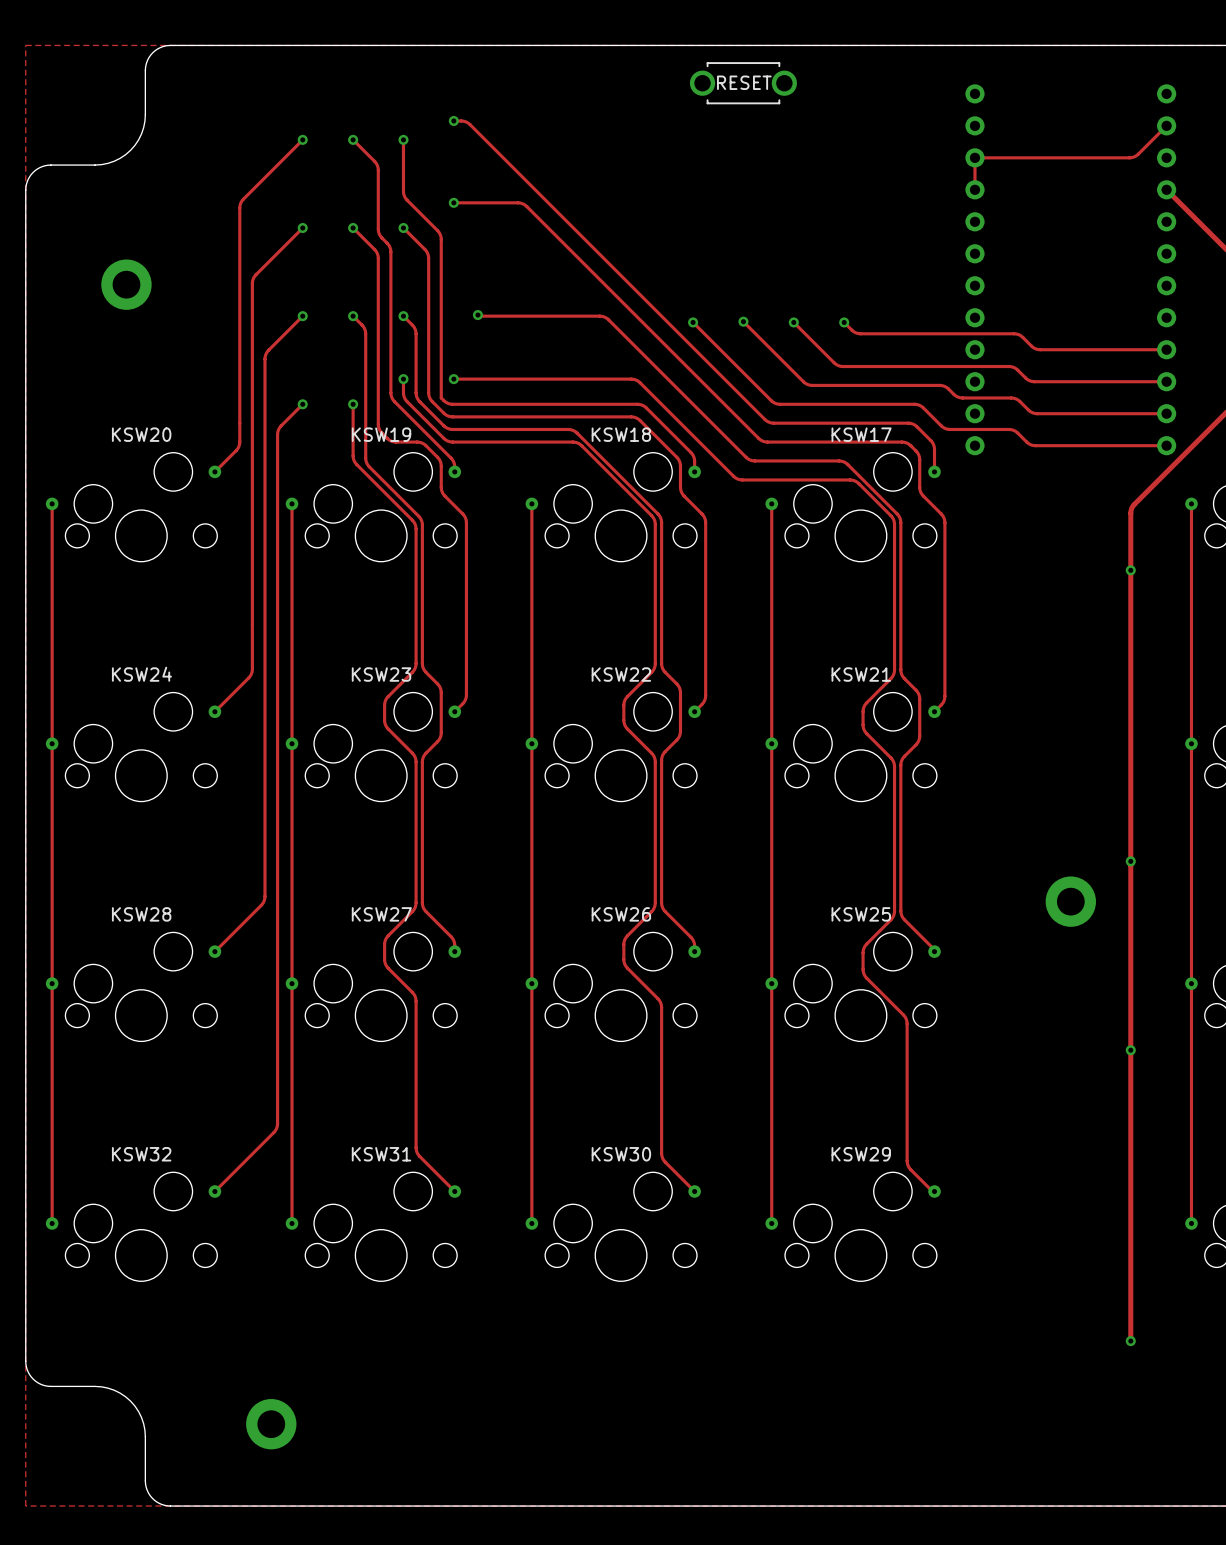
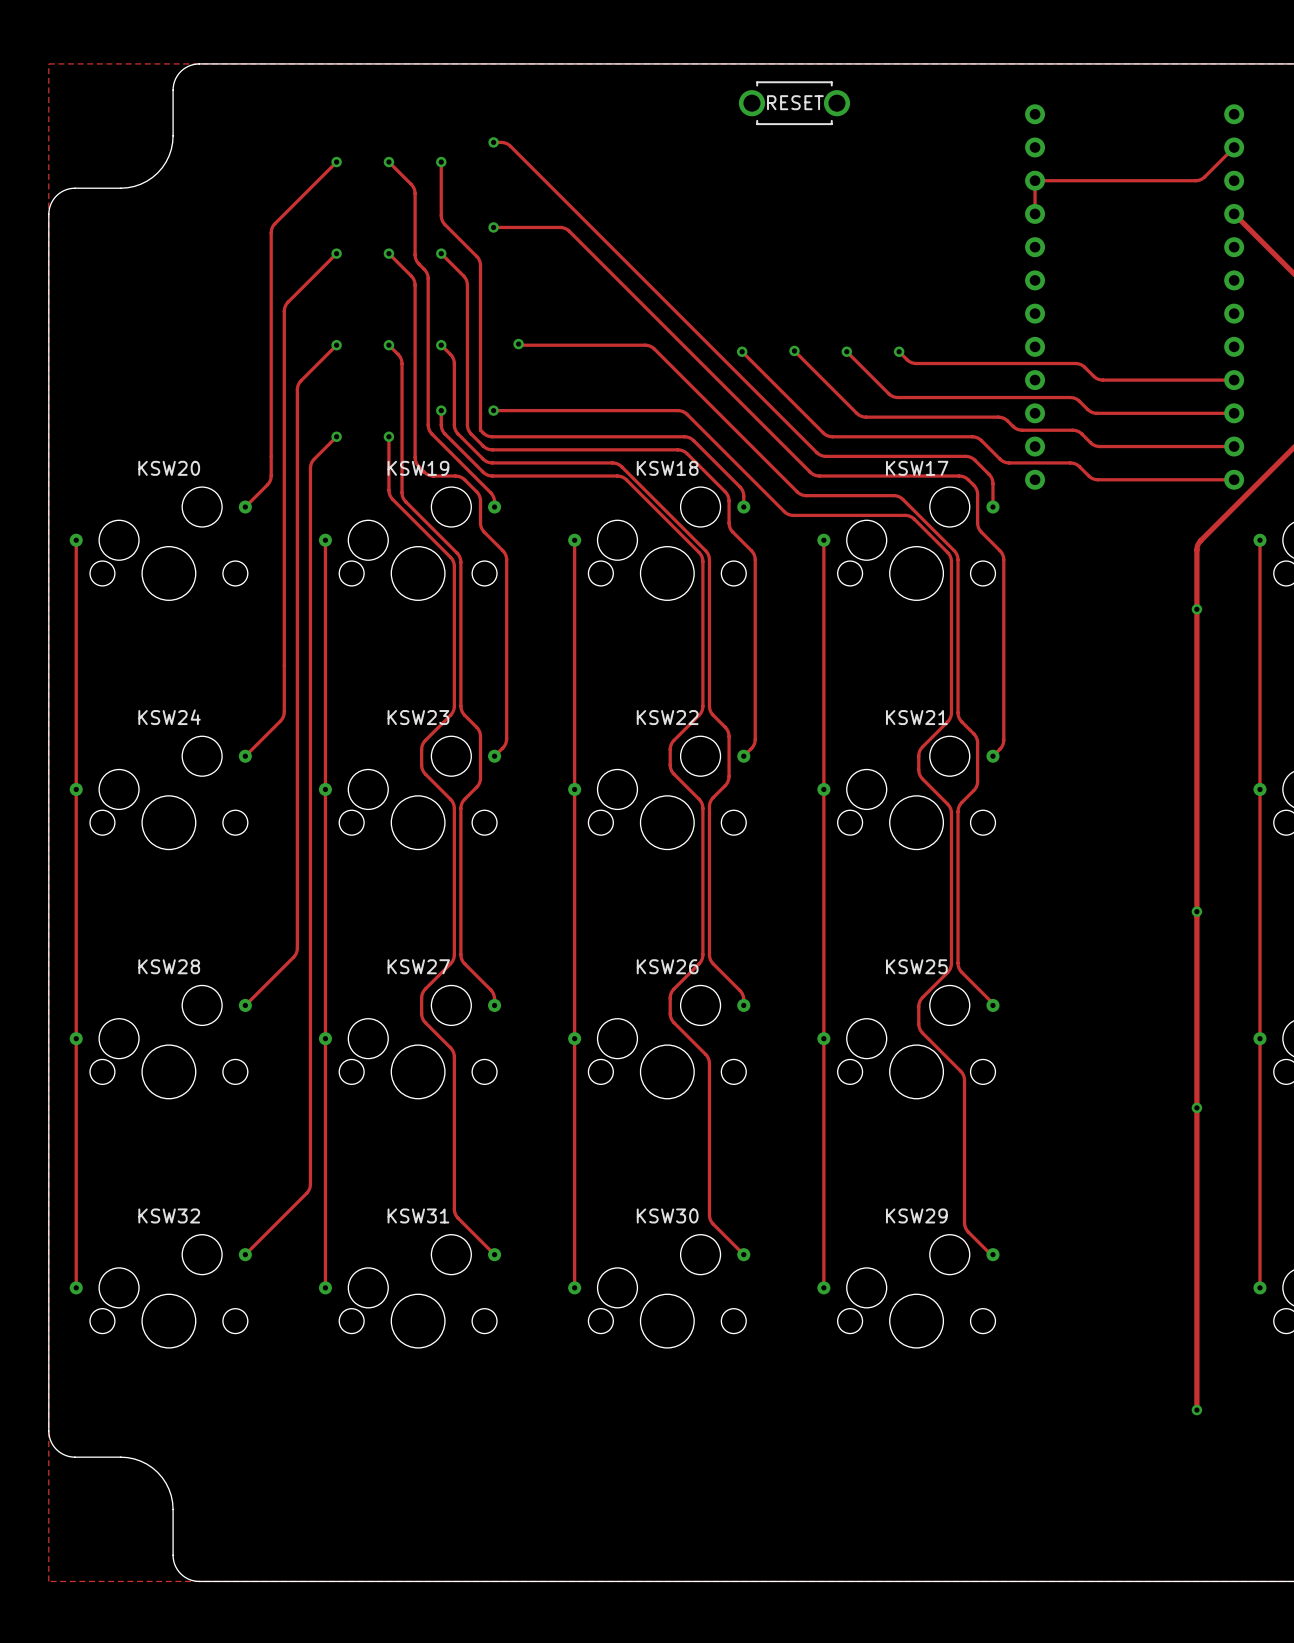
part: (126, 284) -> none
part: (1070, 901) -> none
part: (271, 1424) -> none

